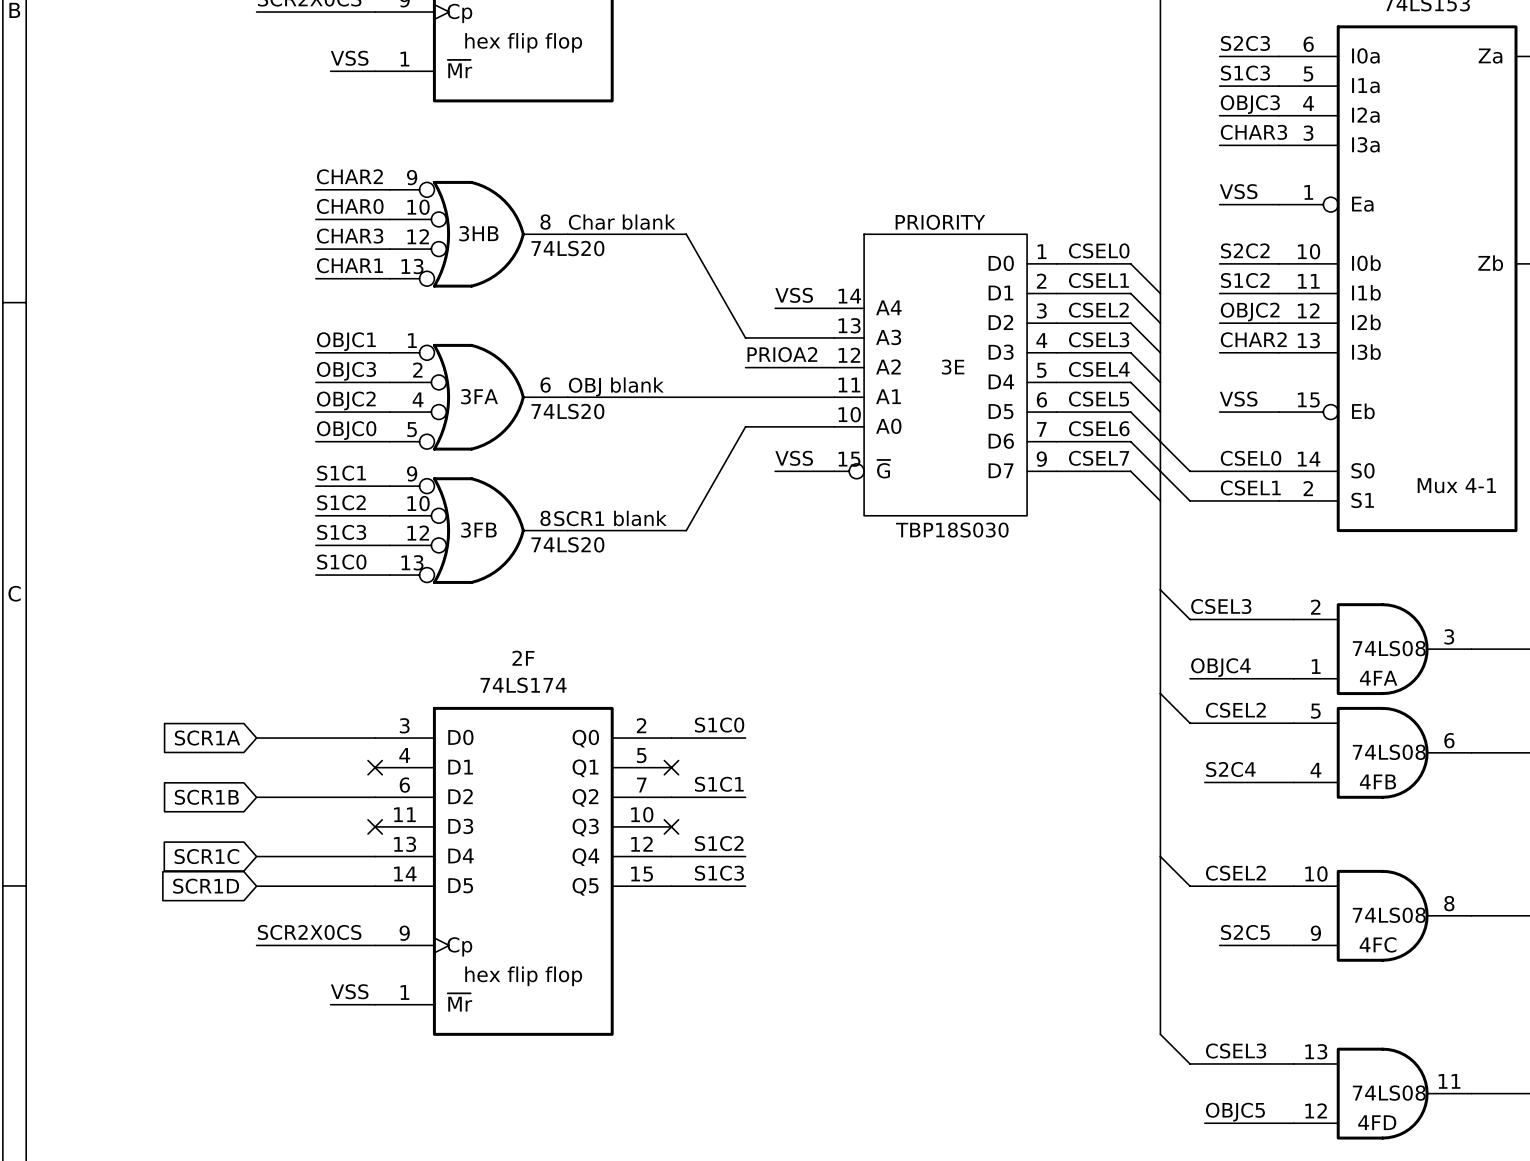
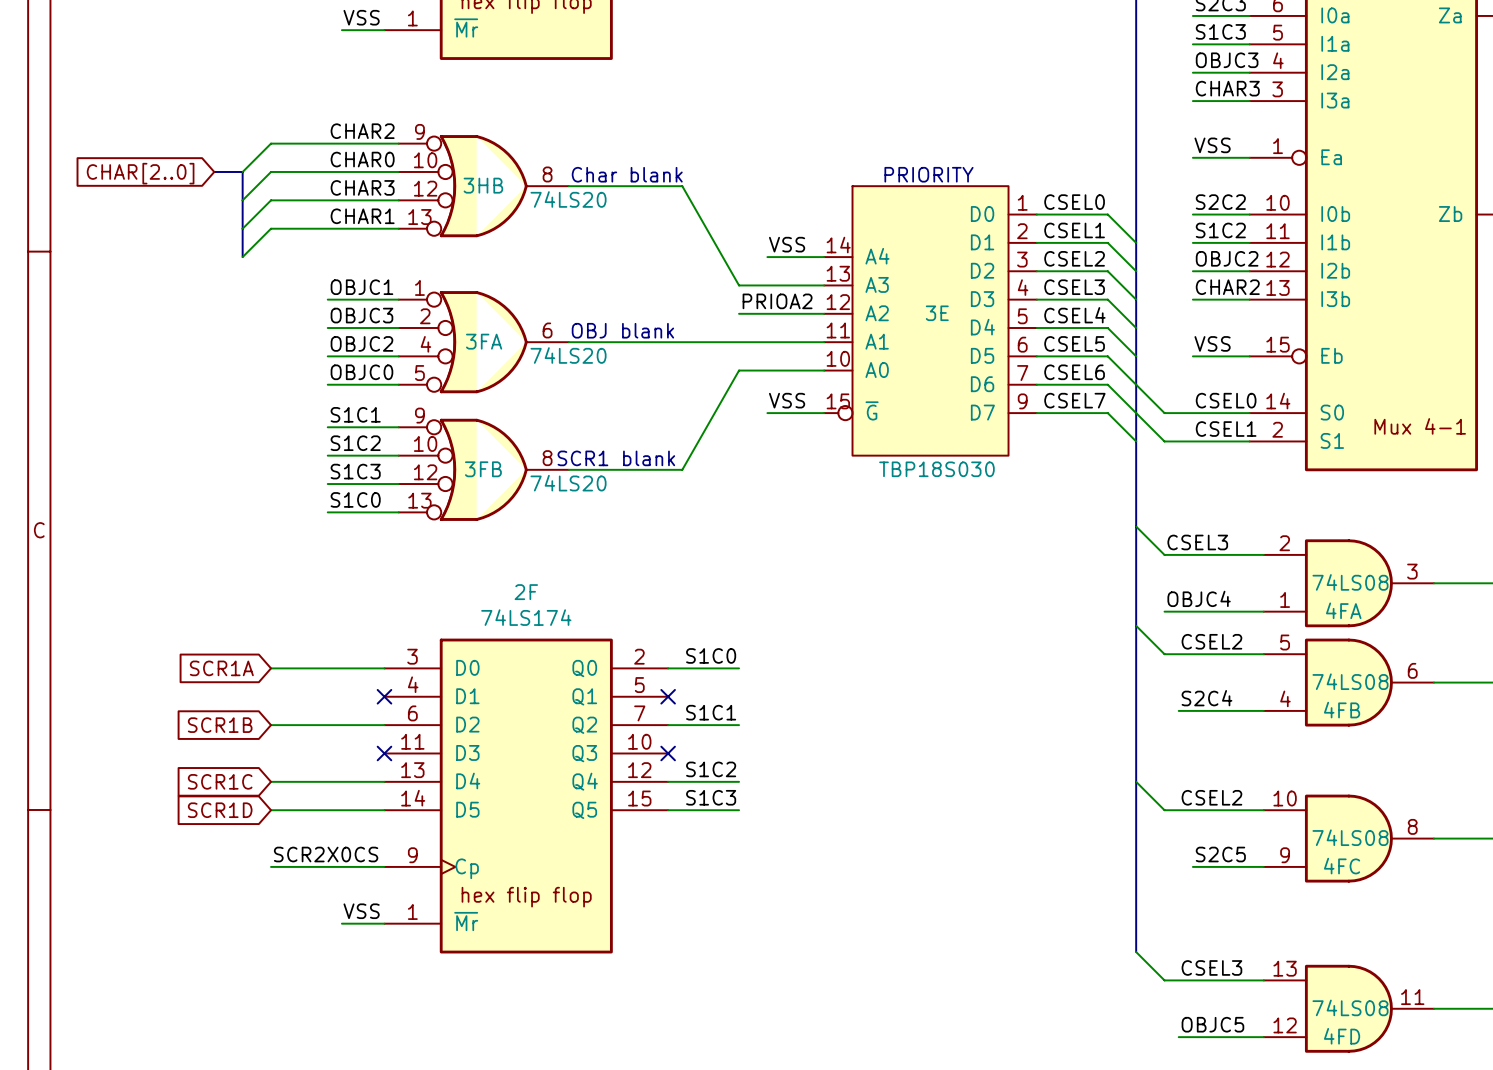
wire: none -> (327, 143) (271, 143) (242, 171)
bus: none -> (214, 171) (242, 171) (242, 257)
wire: none -> (327, 171) (271, 171) (242, 200)
global label: none -> CHAR[2..0] (140, 173)
wire: none -> (327, 200) (271, 200) (242, 228)
wire: none -> (327, 228) (271, 228) (242, 257)

